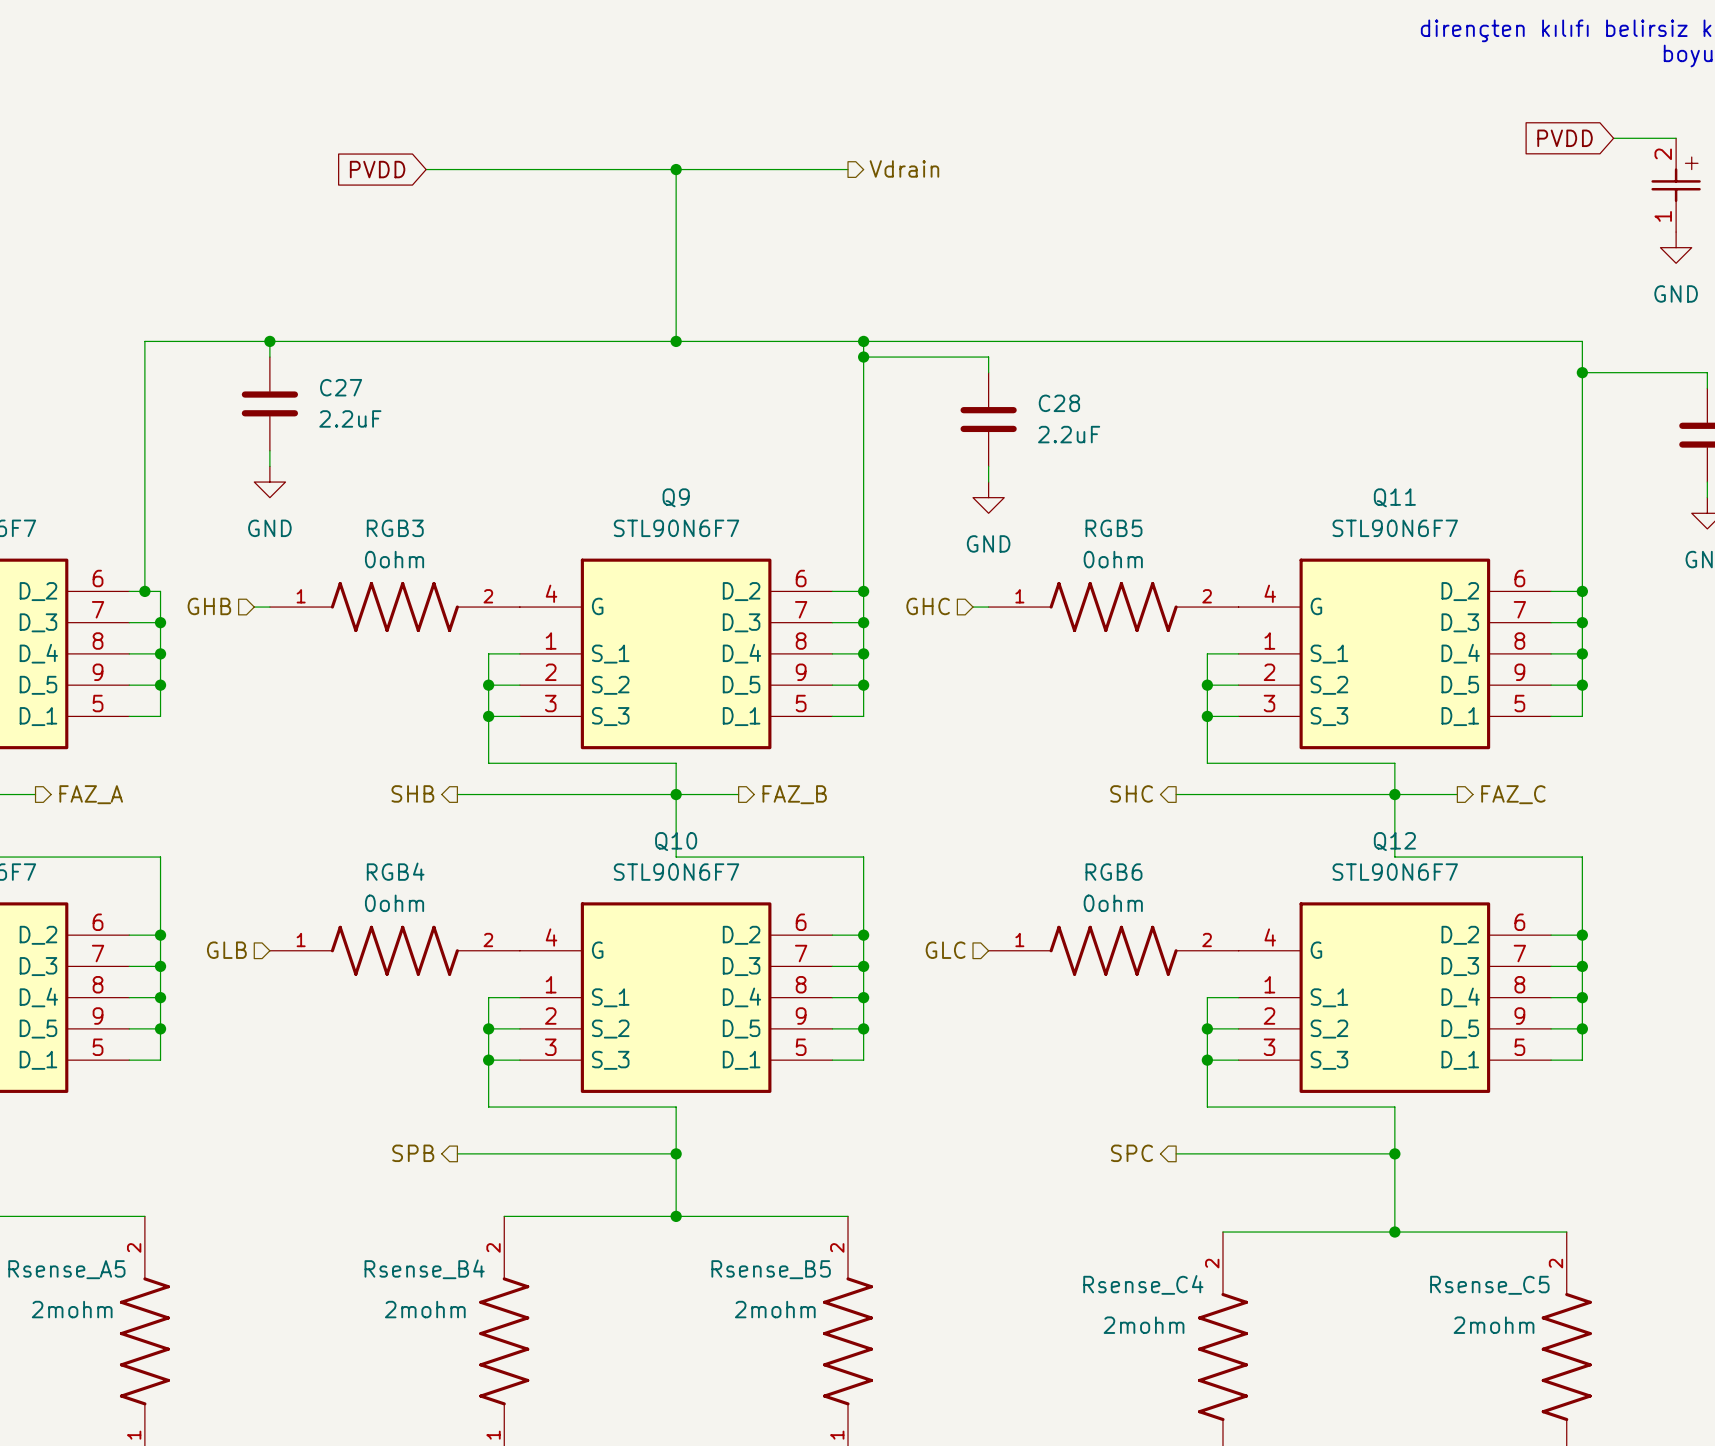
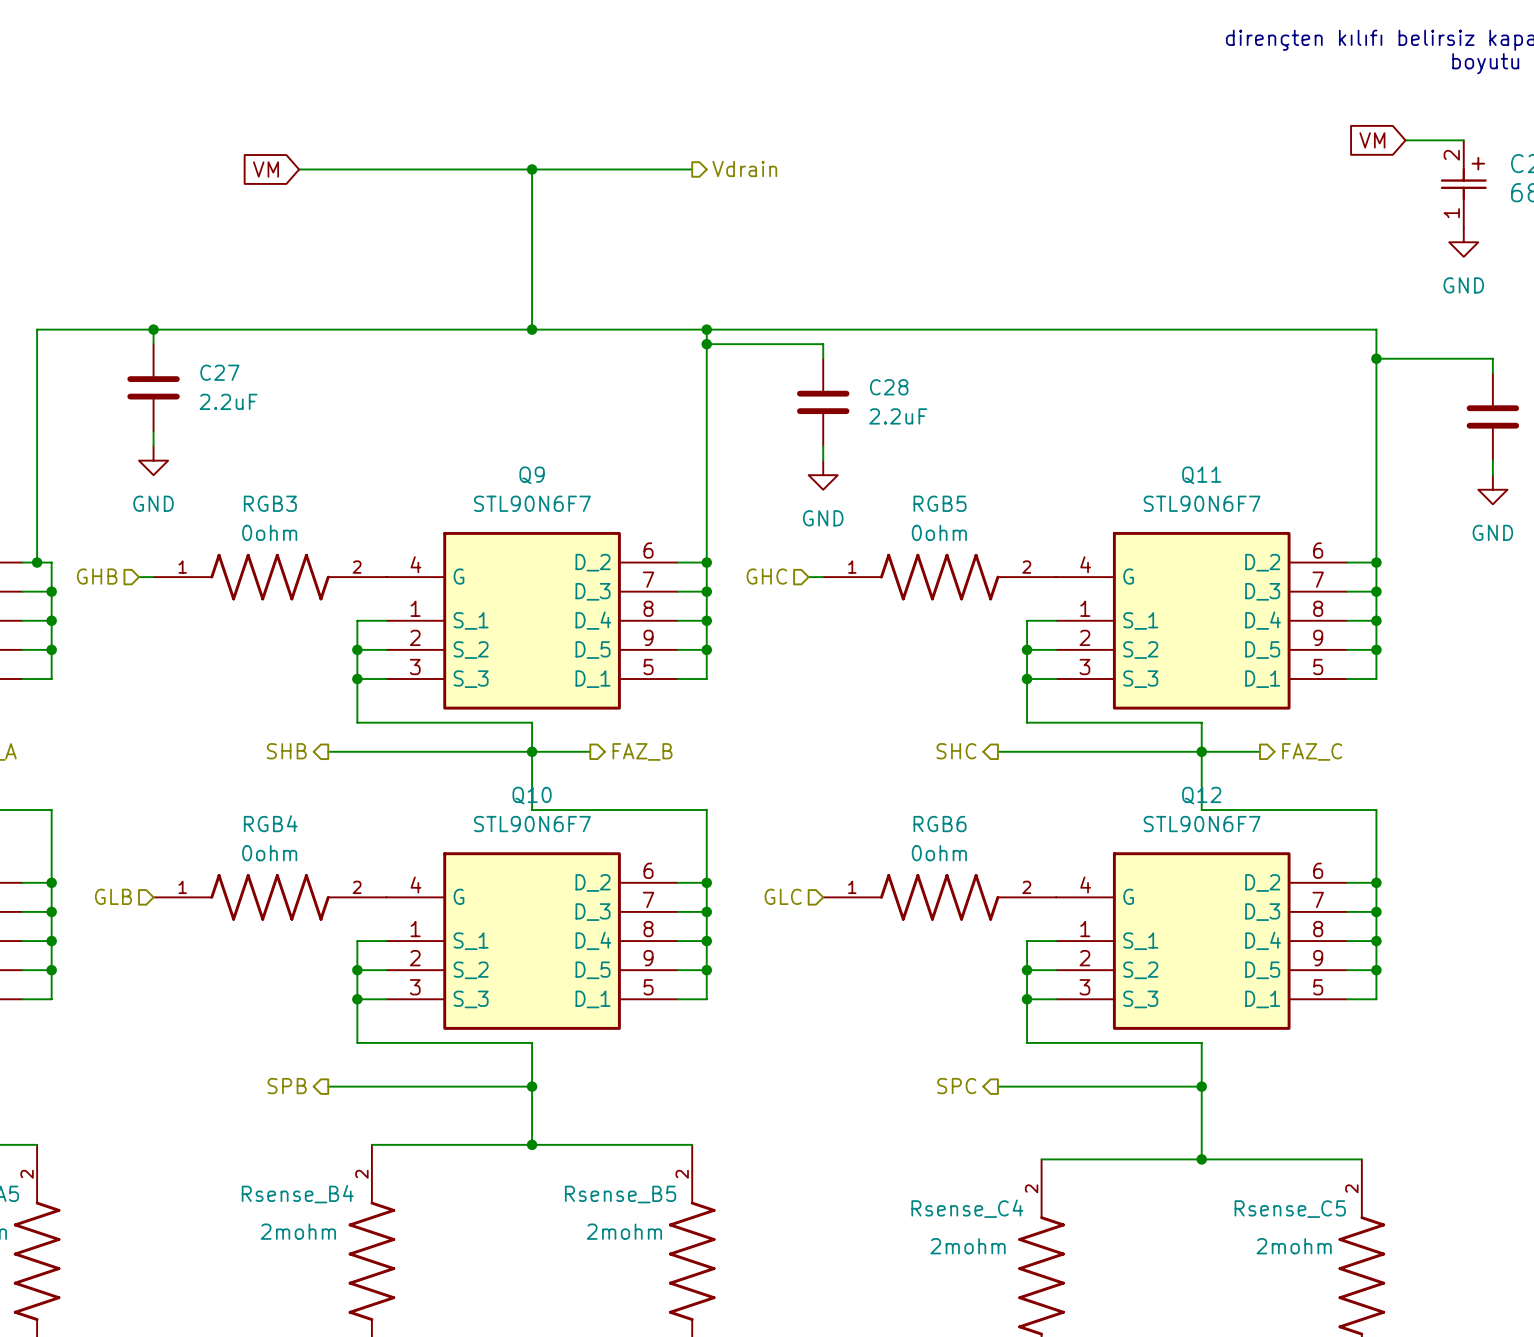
global label: PVDD (1565, 138) -> VM (1372, 140)
global label: PVDD (377, 169) -> VM (266, 169)

